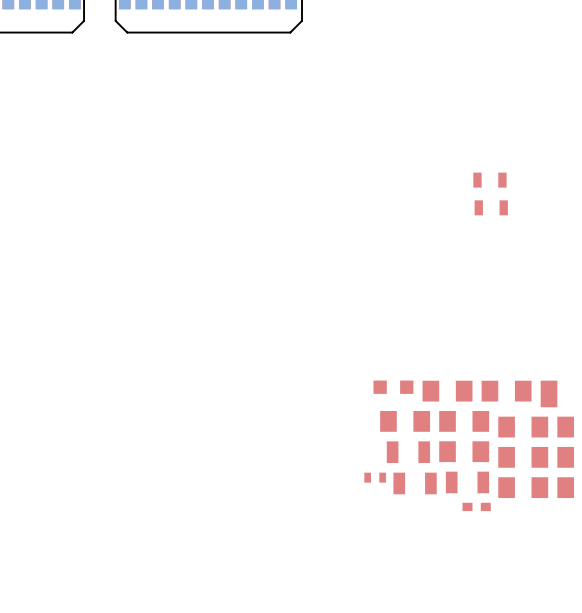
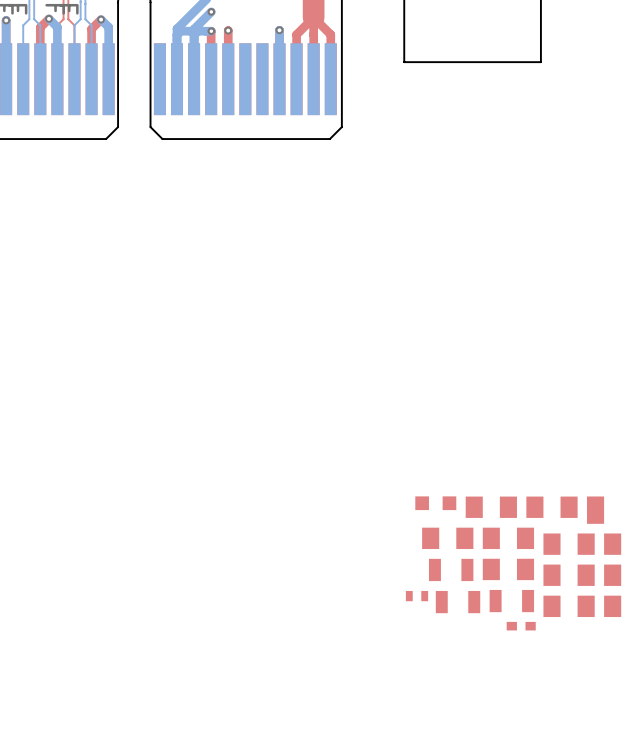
part: (489, 180) -> none
part: (491, 207) -> none

